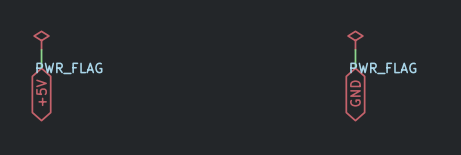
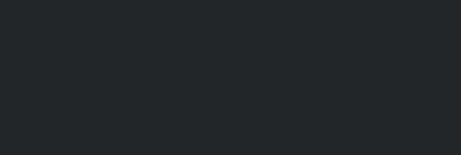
power symbol: PWR_FLAG (41, 40) -> none
power symbol: PWR_FLAG (355, 40) -> none
wire: (41, 49) (41, 68) -> none
wire: (355, 49) (355, 68) -> none
global label: +5V (41, 92) -> none
global label: GND (355, 93) -> none

